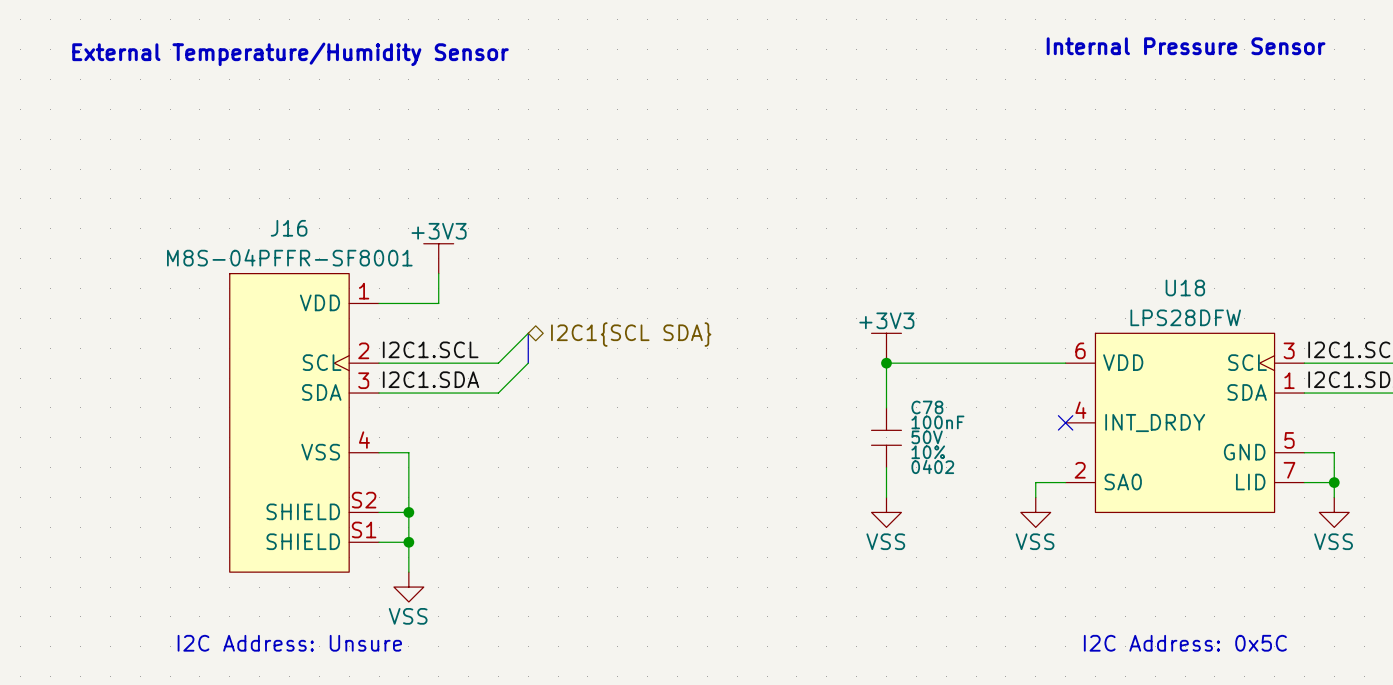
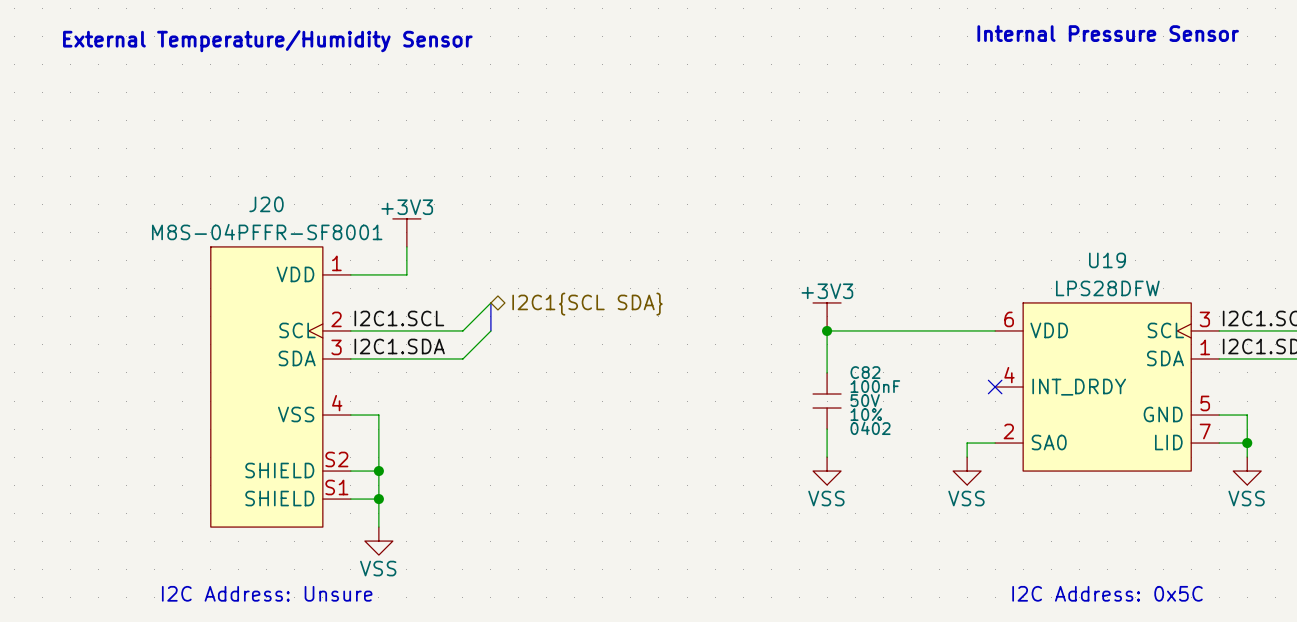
J16 name: J16 (289, 228) -> J20 (266, 204)
U18 name: U18 (1185, 287) -> U19 (1107, 260)
C78 name: C78 (927, 407) -> C82 (865, 372)

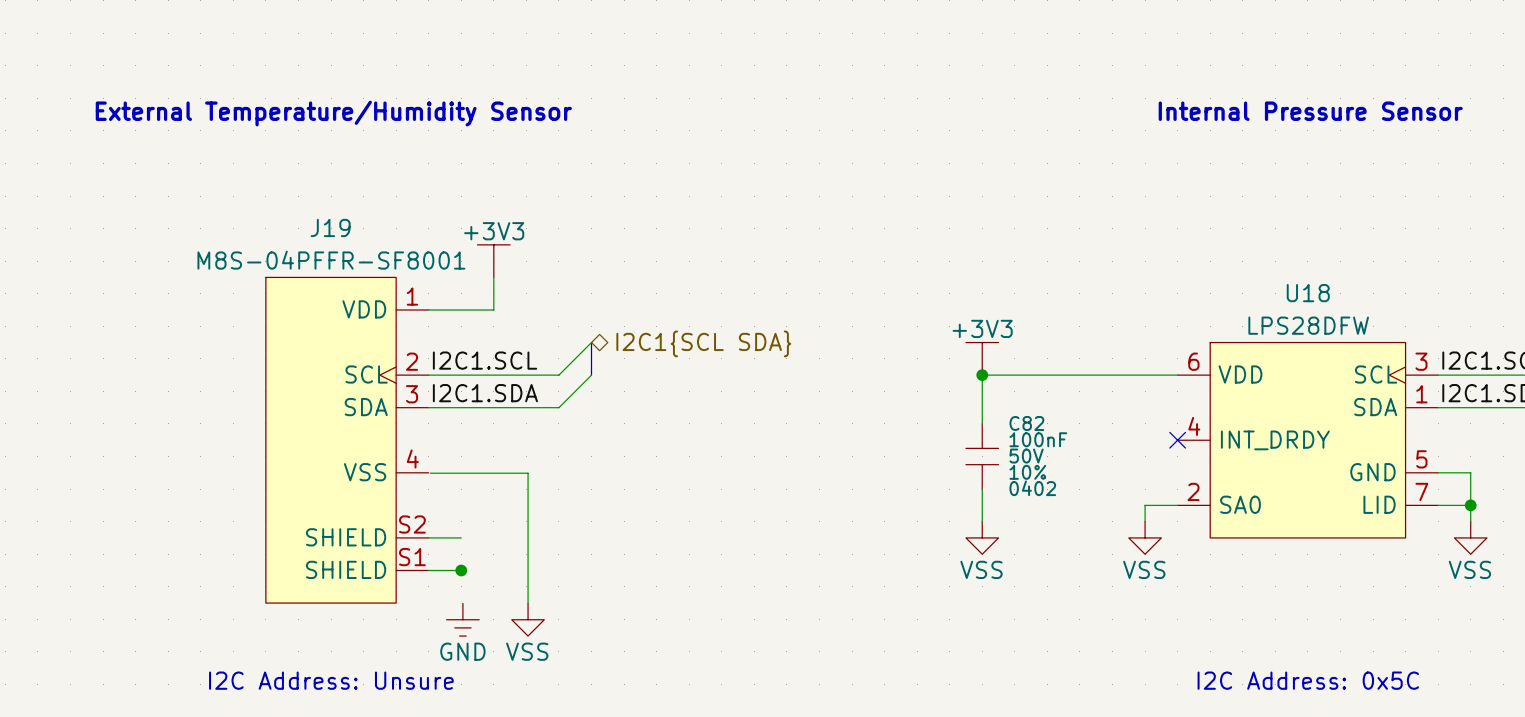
text position: Internal Pressure Sensor (1108, 33) -> Internal Pressure Sensor (1310, 111)
text position: External Temperature/Humidity Sensor (267, 41) -> External Temperature/Humidity Sensor (333, 113)
J20 name: J20 (266, 204) -> J19 (330, 227)
U19 name: U19 (1107, 260) -> U18 (1308, 293)
wire: (350, 415) (378, 415) (378, 527) -> none
wire: none -> (430, 473) (528, 473) (528, 603)
junction: (378, 471) -> none
power symbol: VSS (378, 541) -> GND (462, 619)
power symbol: none -> VSS (528, 619)

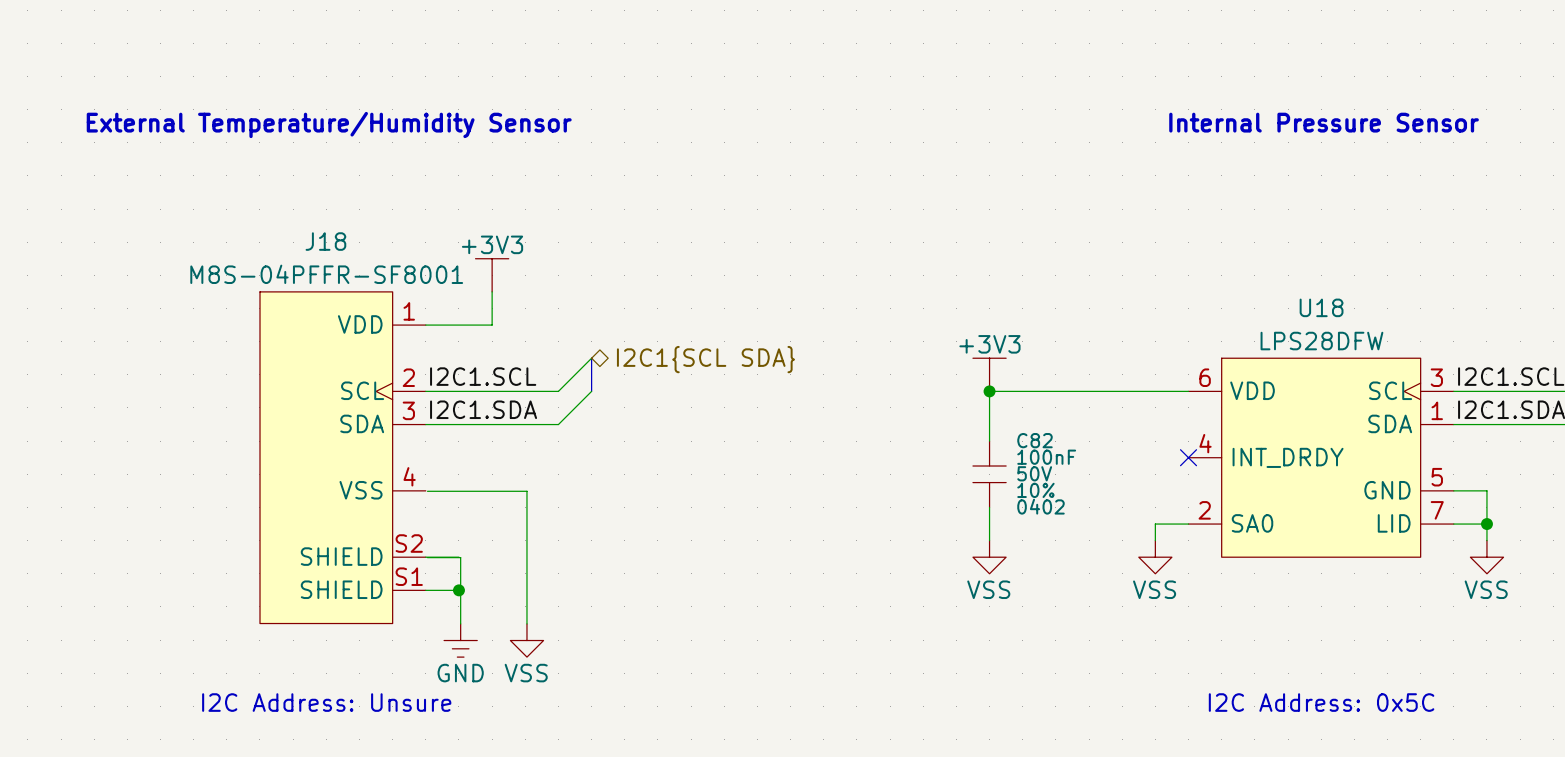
J19 name: J19 (330, 227) -> J18 (325, 241)
wire: none -> (427, 557) (460, 557) (460, 623)

